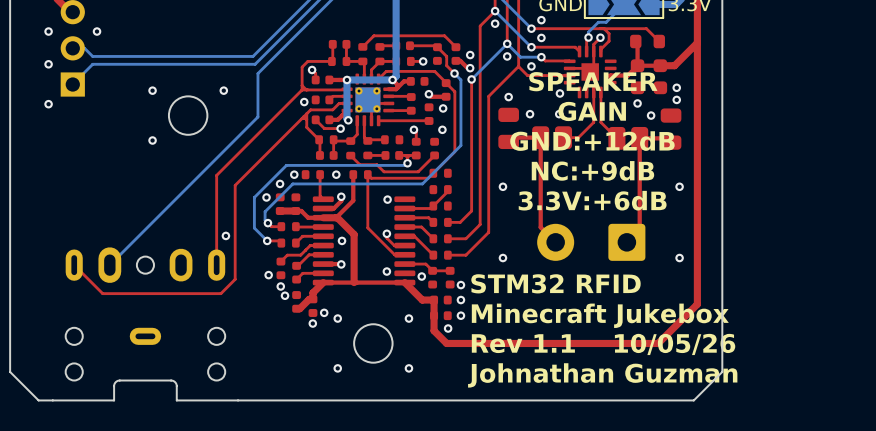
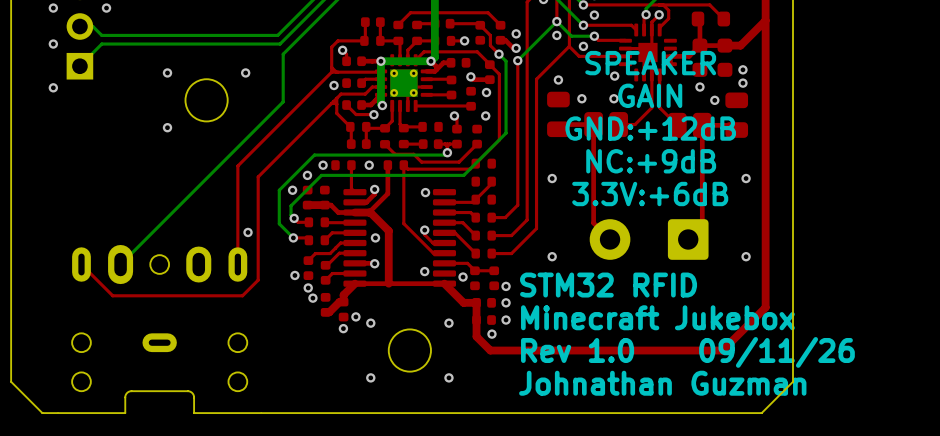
text: Rev 1.1 10/05/26 (603, 344) -> Rev 1.0 09/11/26 (687, 352)

